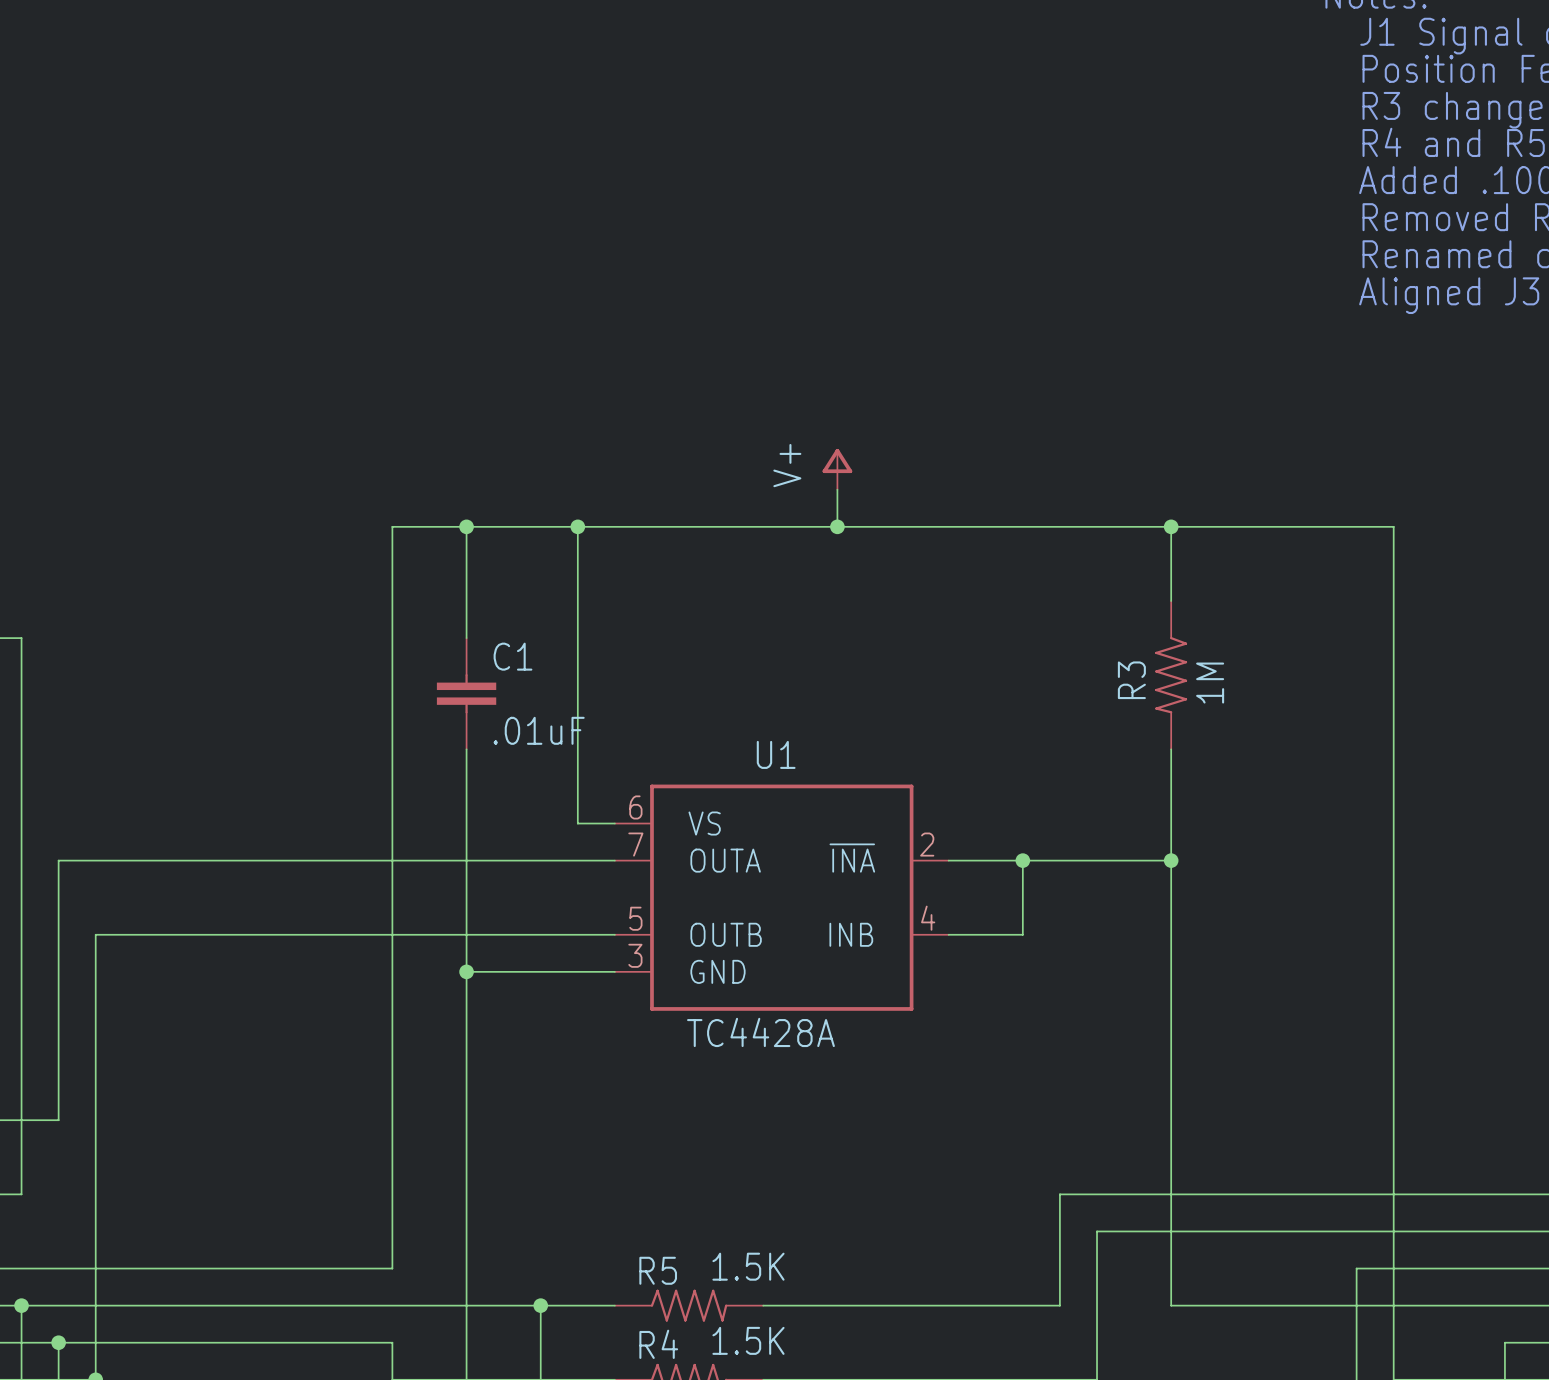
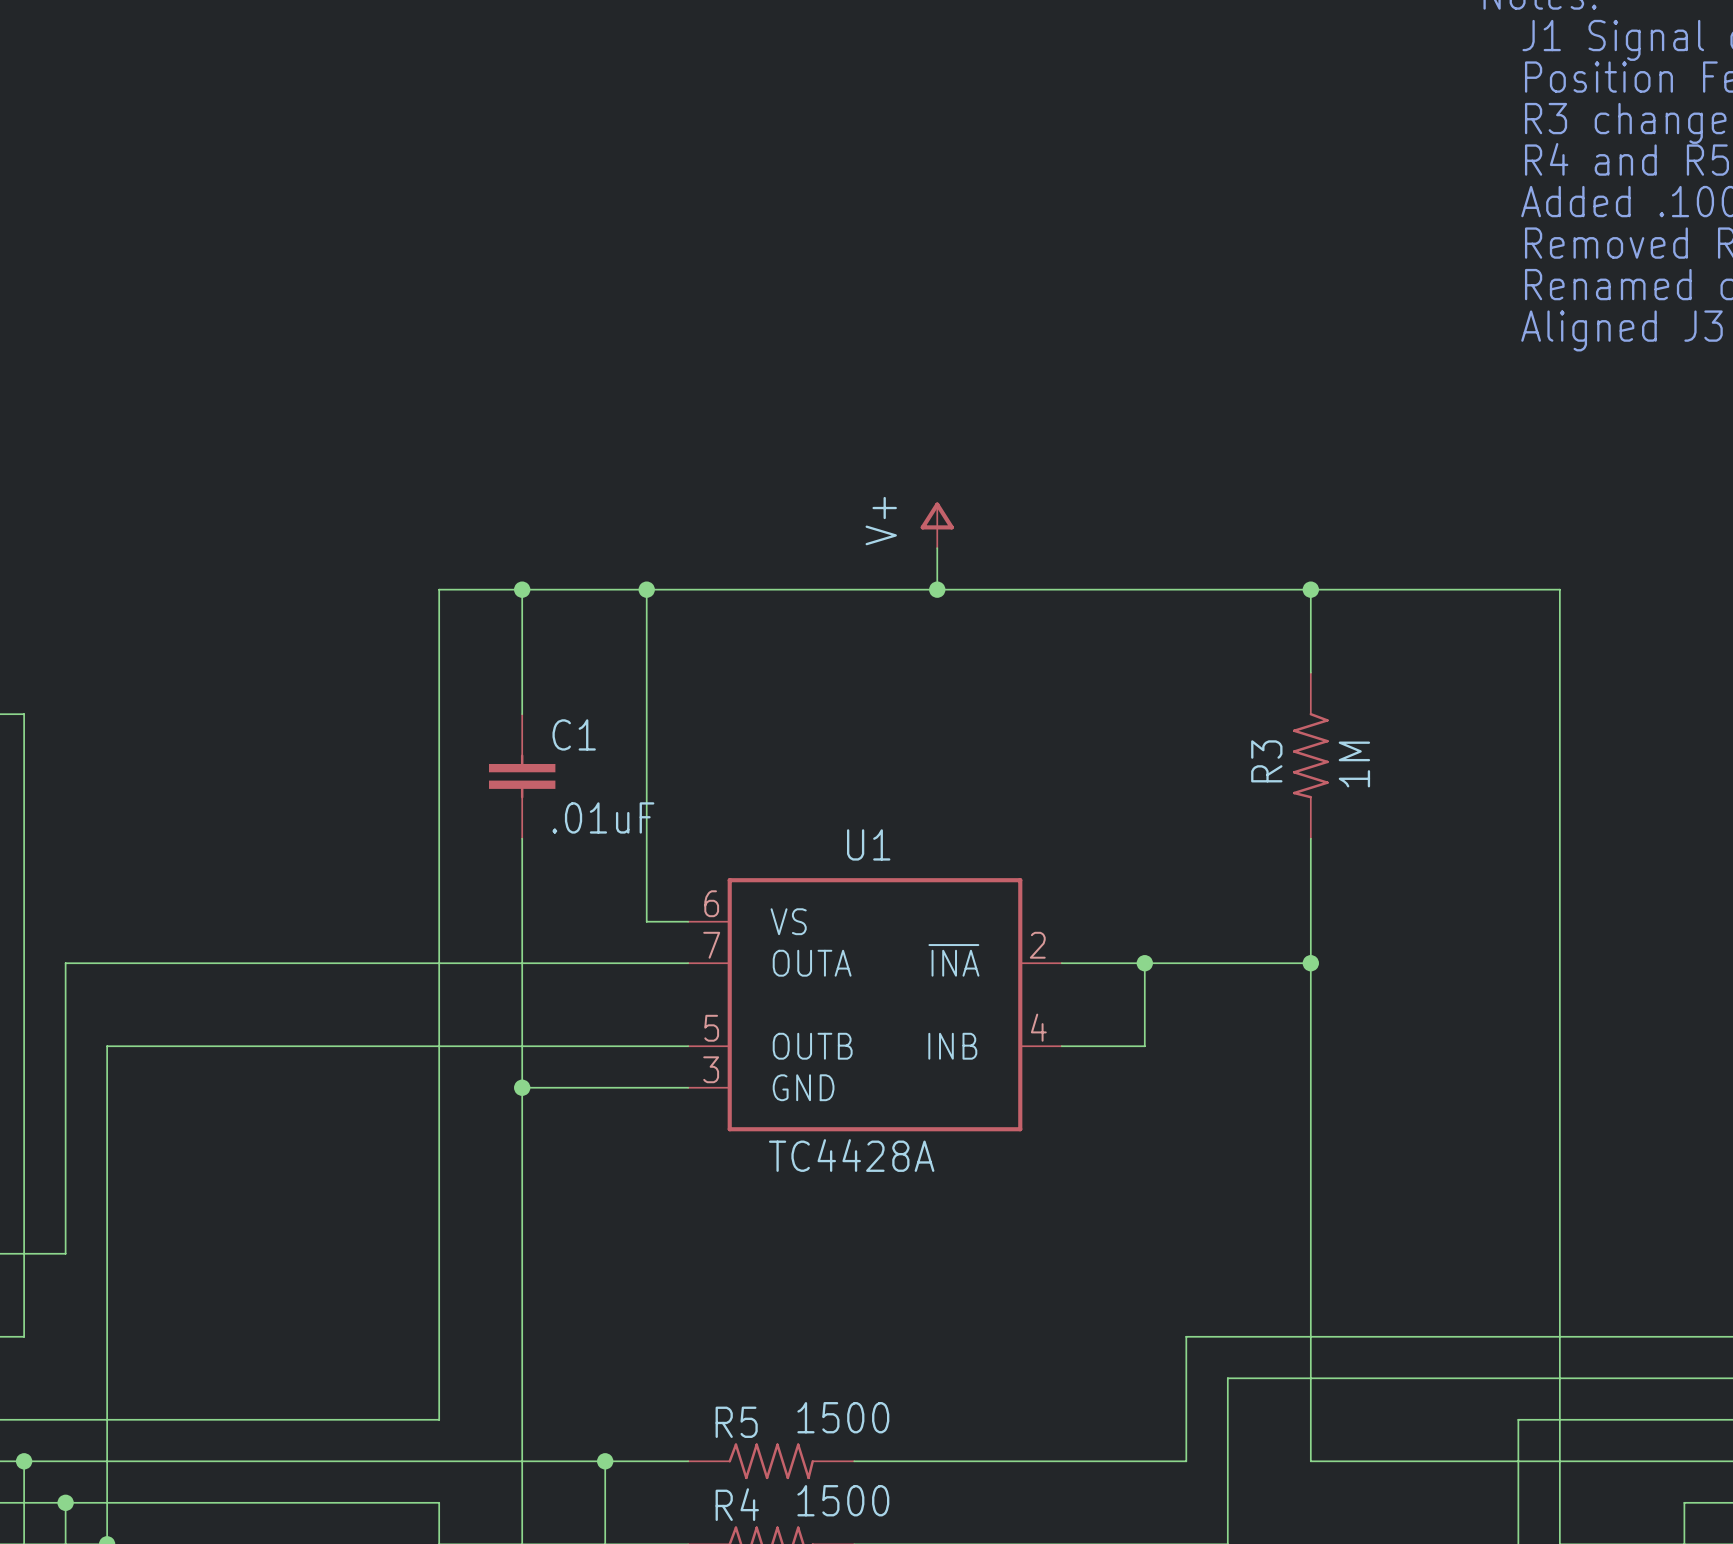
R5 value: 1.5K (748, 1266) -> 1500 (843, 1417)
R4 value: 1.5K (748, 1340) -> 1500 (843, 1500)

